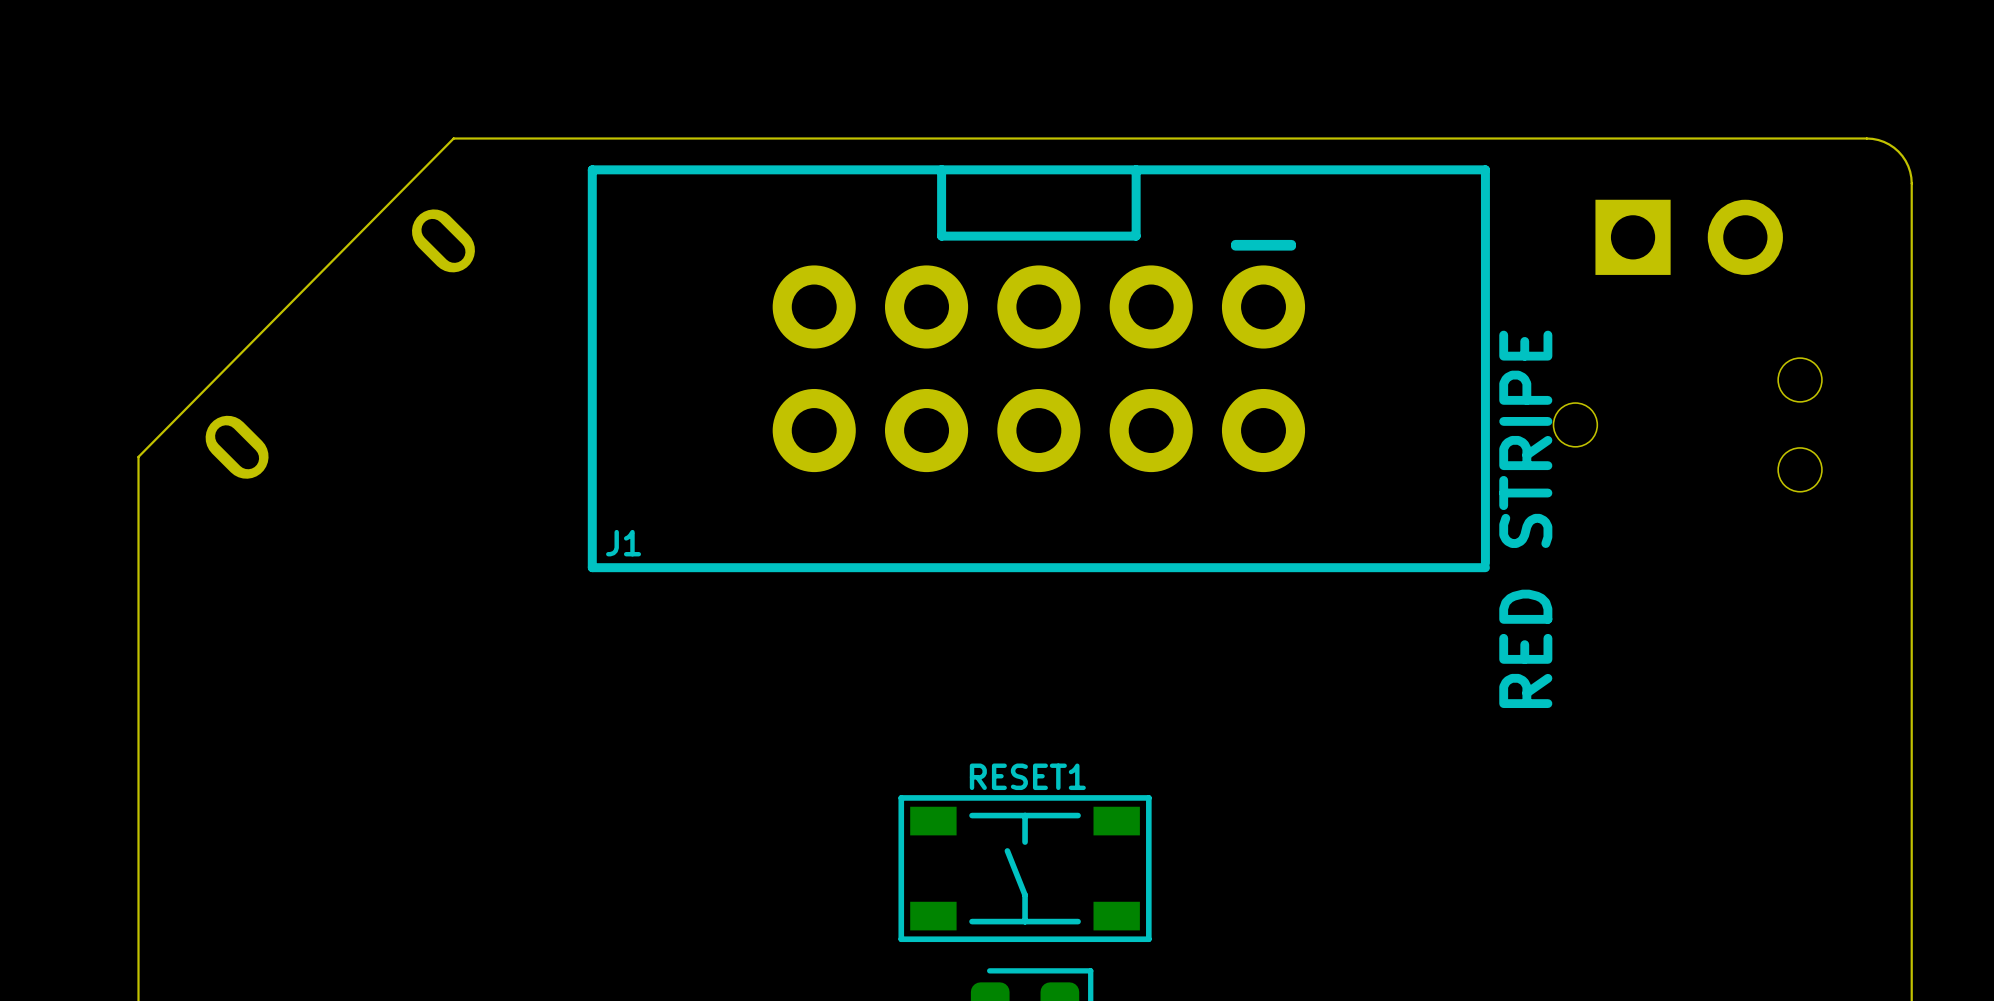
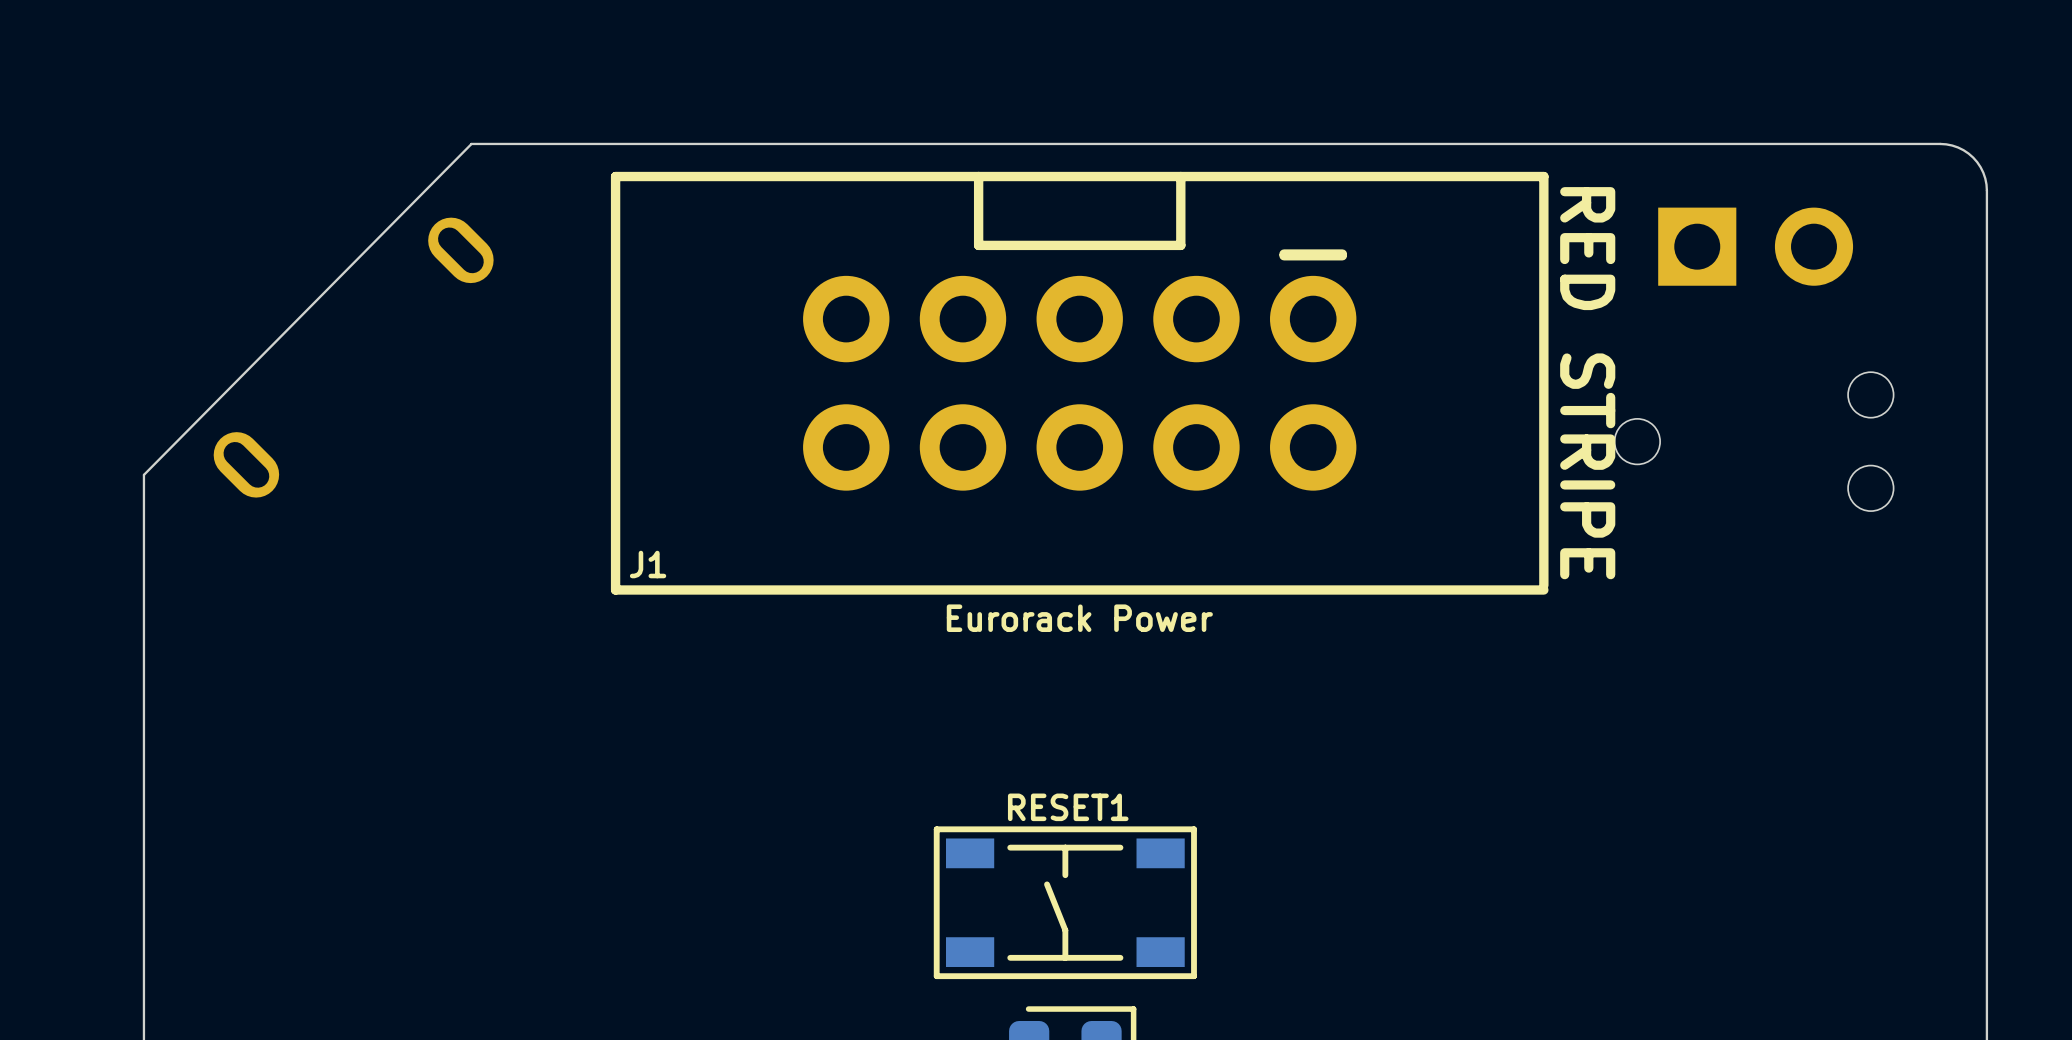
text rotation: 0° (1525, 519) -> 180° (1587, 383)
J1 value: none -> Eurorack Power (1079, 618)

